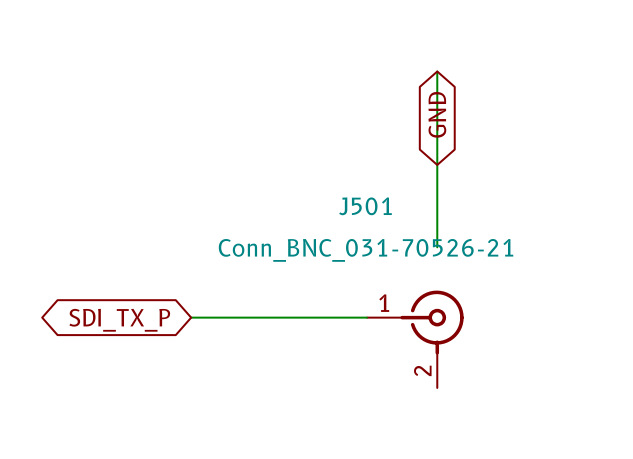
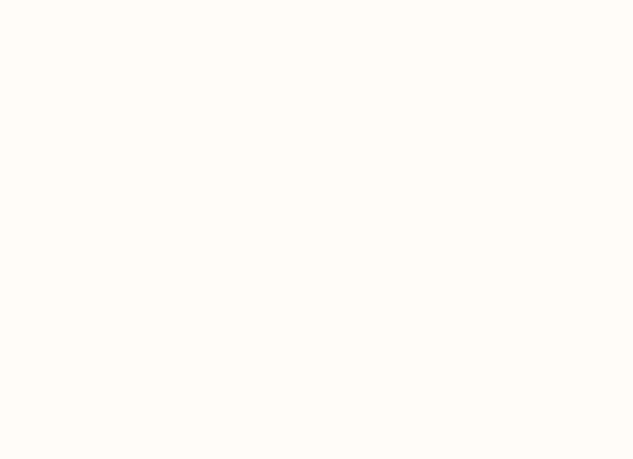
wire: (437, 71) (437, 247) -> none
global label: GND (437, 114) -> none
wire: (191, 317) (366, 317) -> none
global label: SDI_TX_P (119, 320) -> none
J501: Conn_BNC_031-70526-21 (415, 339) -> none

